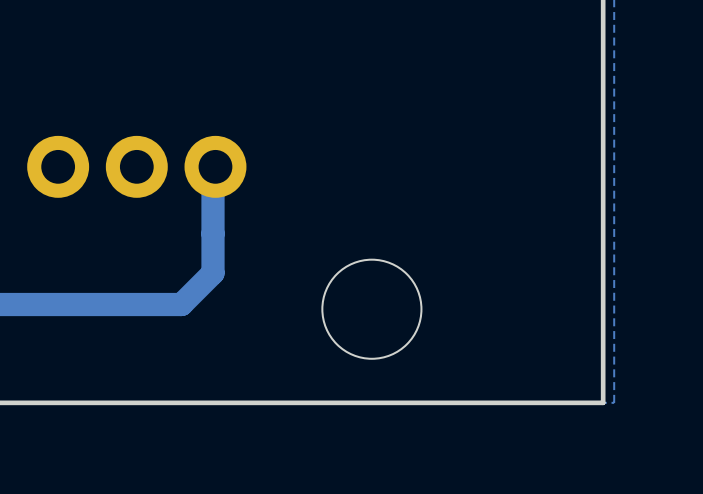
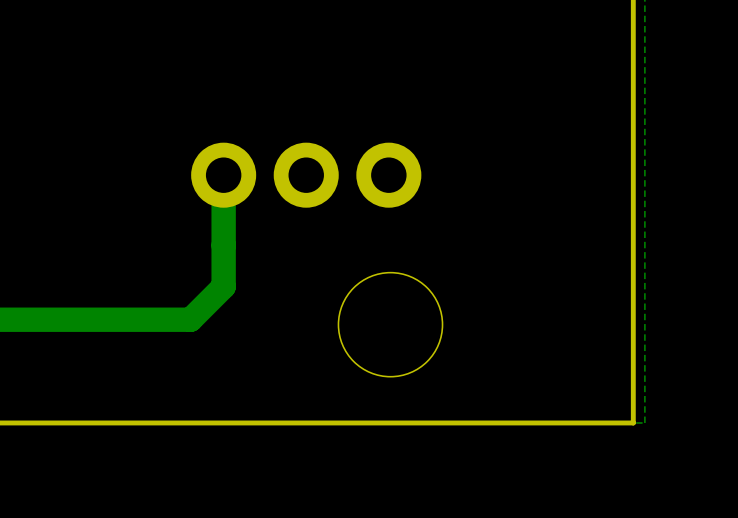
part position: (136, 166) -> (306, 175)

